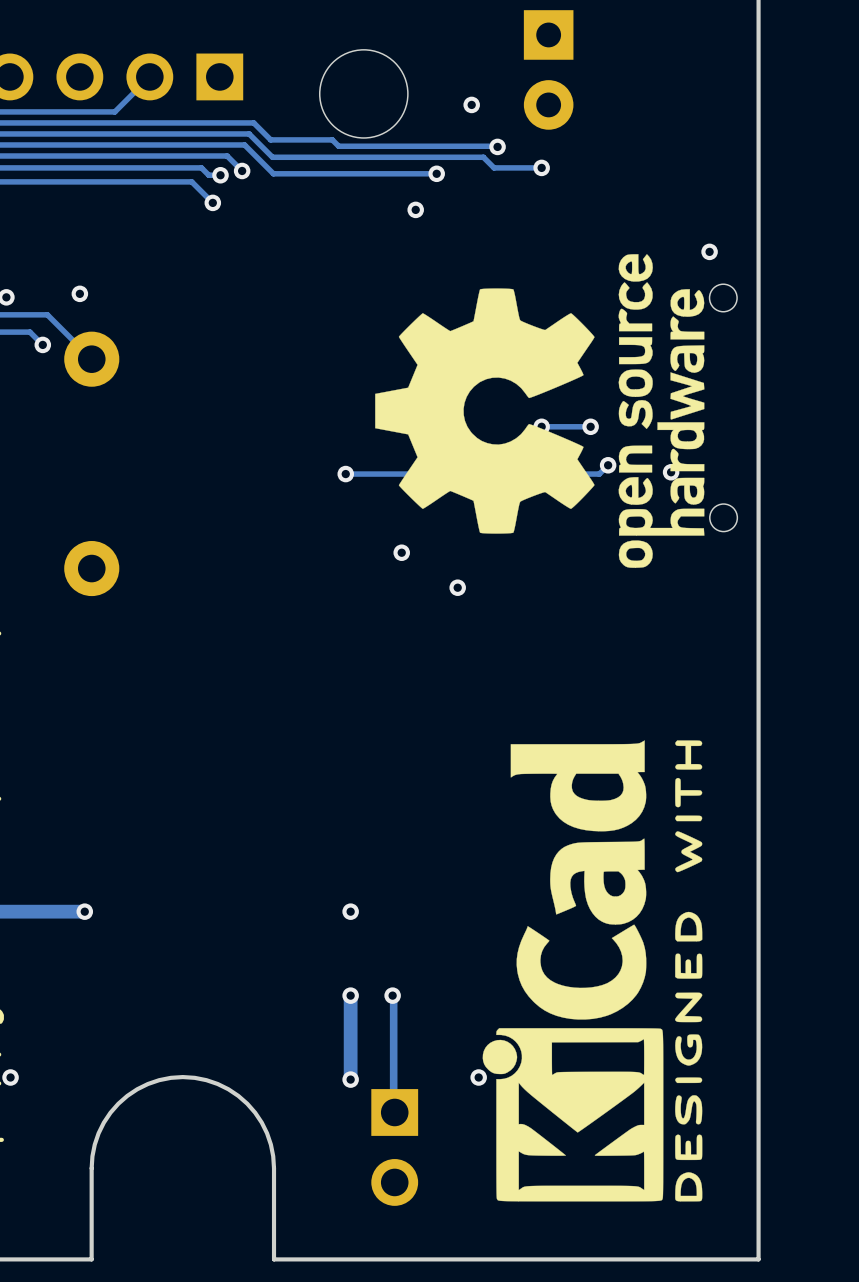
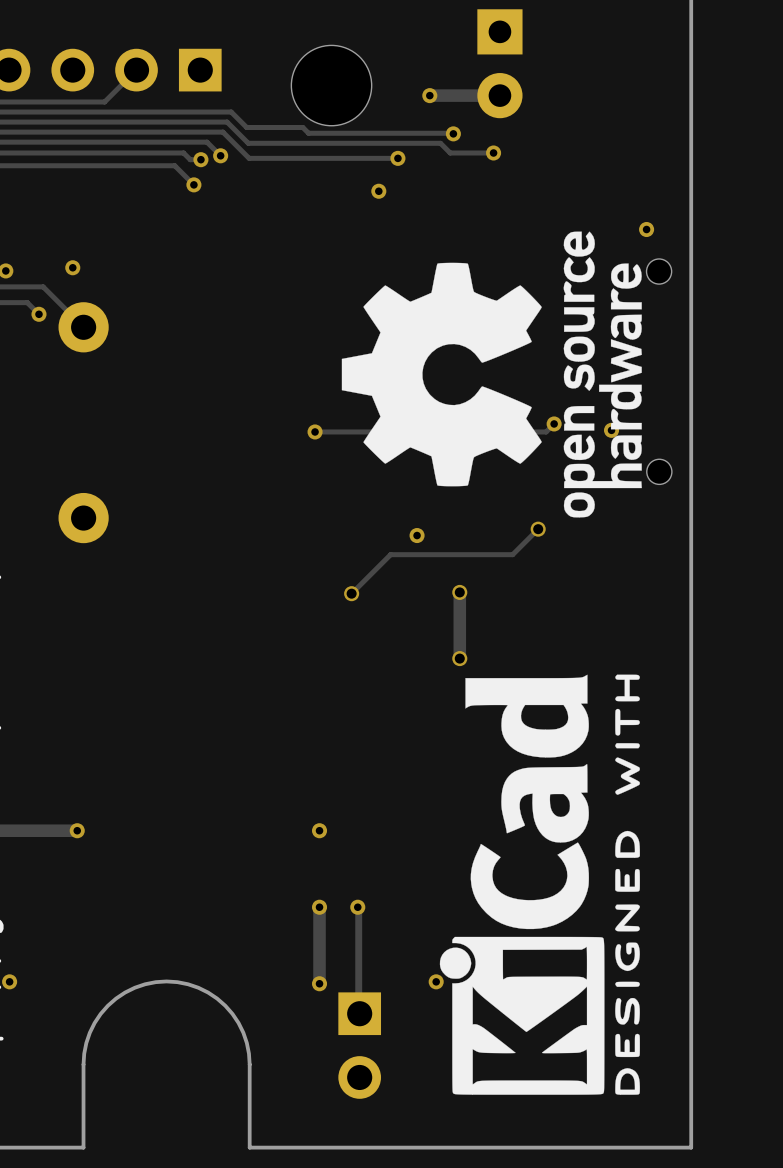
track: none -> (499, 95) (429, 95)
via: (541, 426) -> none
track: (590, 426) (541, 426) -> none
via: (590, 426) -> none
via: (401, 552) -> none
track: none -> (538, 529) (512, 554) (390, 554) (351, 593)
via: none -> (538, 529)
track: none -> (459, 592) (459, 658)
via: none -> (459, 592)
via: none -> (351, 593)
via: none -> (459, 658)

